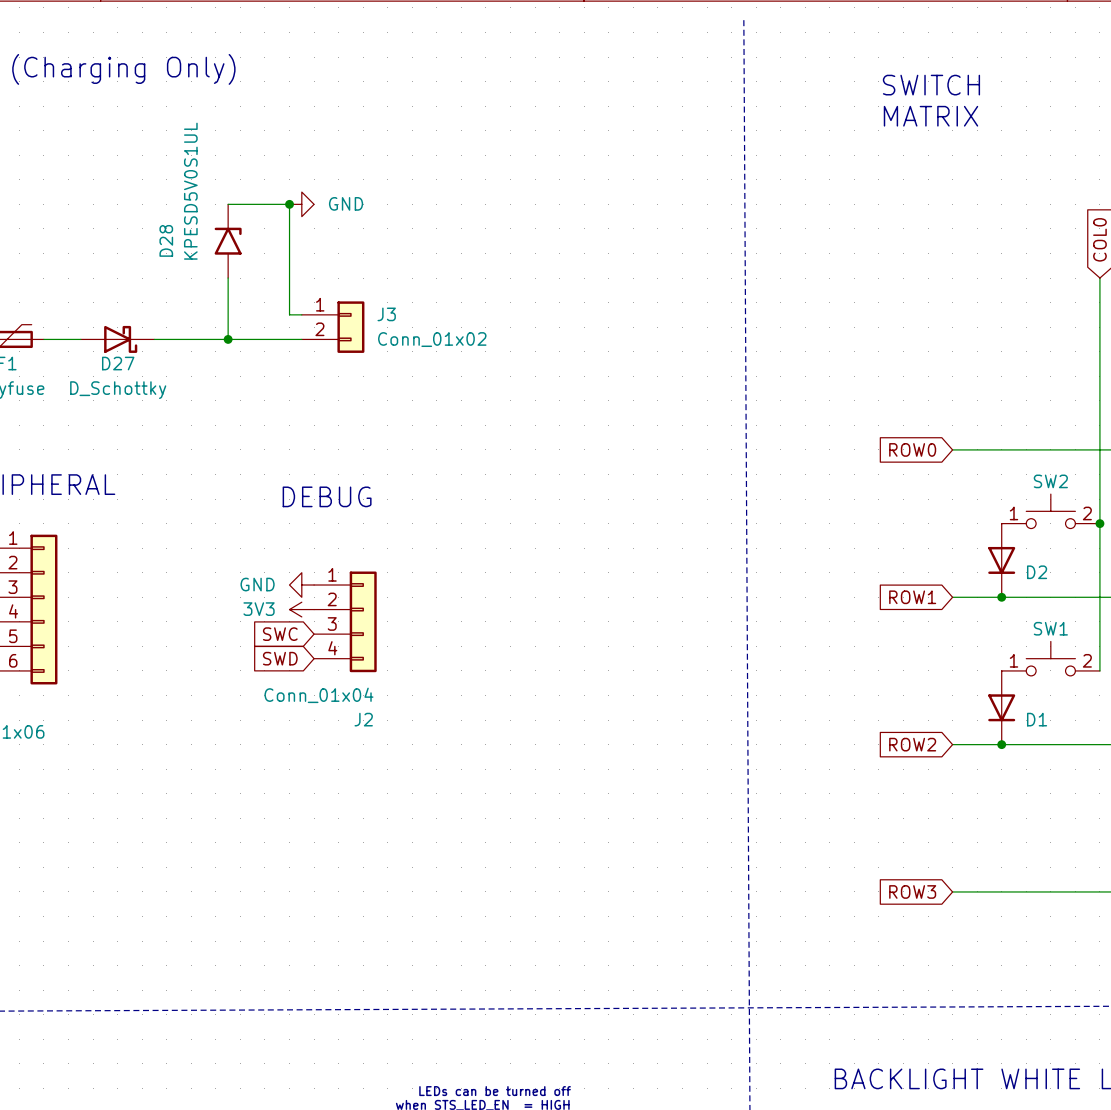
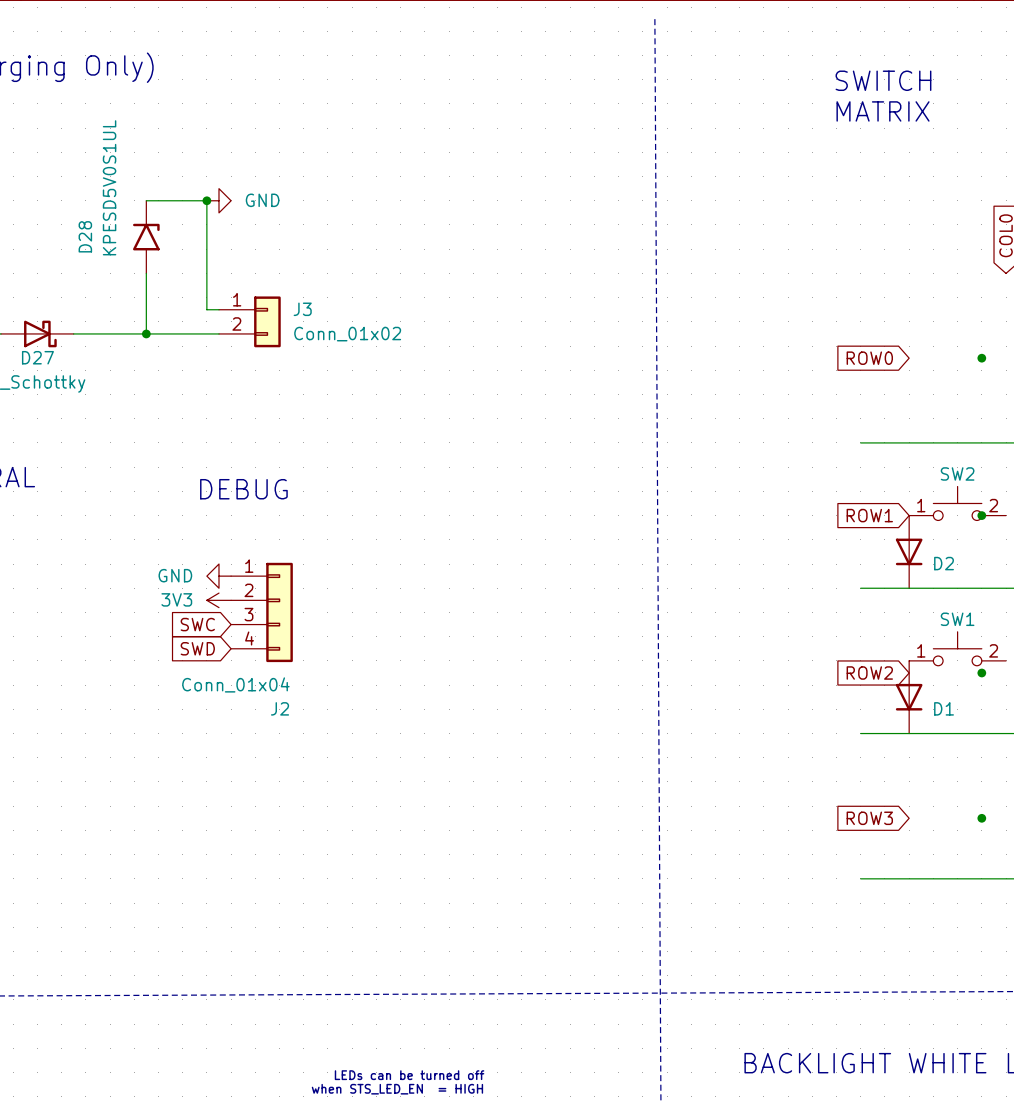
text position: SWITCH (931, 85) -> SWITCH (883, 80)
text position: MATRIX (931, 116) -> MATRIX (883, 111)
wire: (1099, 278) (1099, 670) -> none
junction: none -> (981, 358)
global label position: ROW0 (912, 449) -> ROW0 (869, 358)
junction position: (1099, 523) -> (981, 515)
global label position: ROW1 (912, 597) -> ROW1 (869, 515)
junction: (1001, 597) -> none
junction: none -> (981, 673)
global label position: ROW2 (912, 744) -> ROW2 (869, 673)
junction: (1001, 744) -> none
junction: none -> (981, 818)
global label position: ROW3 (912, 891) -> ROW3 (869, 818)

